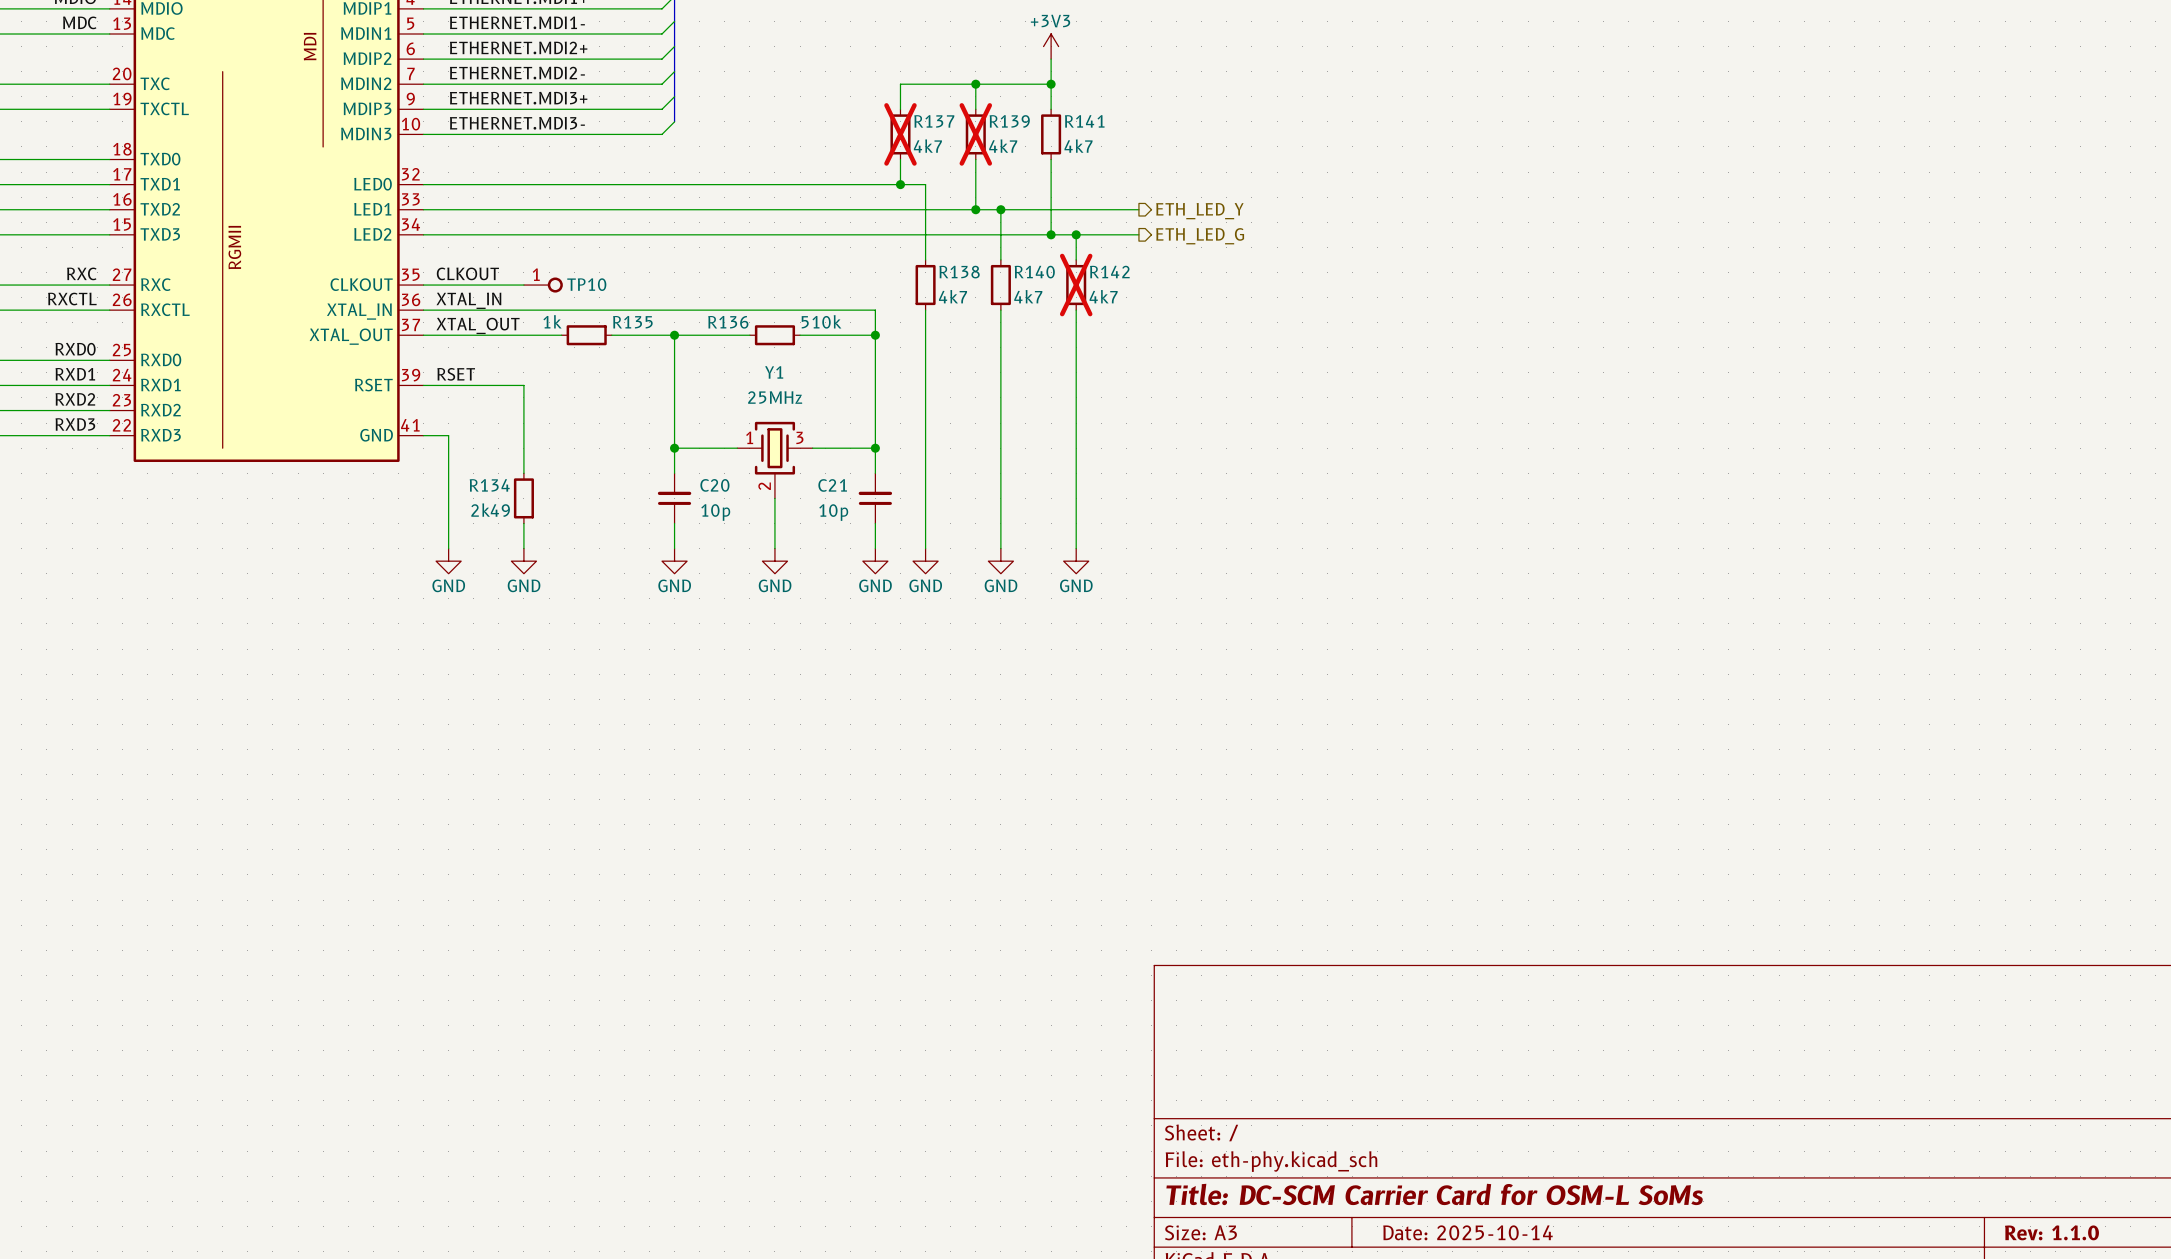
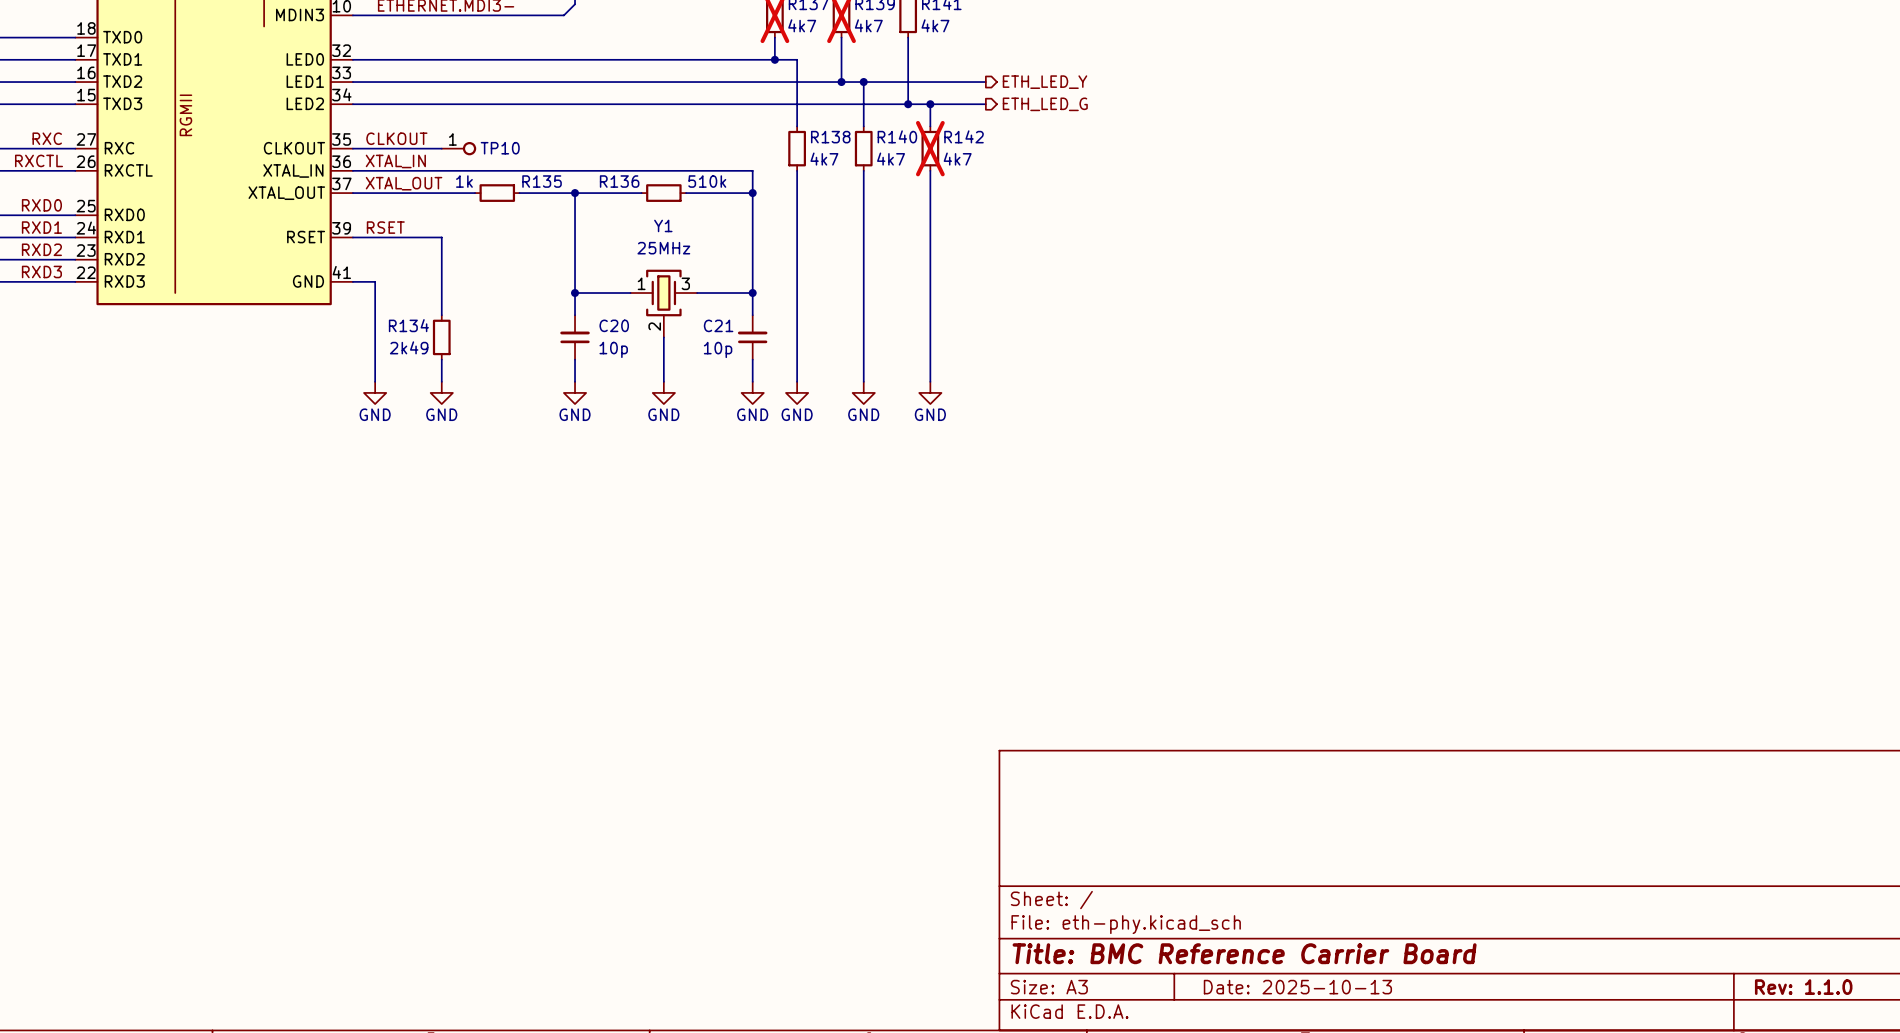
title block: Title: DC-SCM Carrier Card for OSM-L SoMs (1434, 1194) -> Title: BMC Reference Carrier Board (1244, 953)
title block: Date: 2025-10-14 (1468, 1232) -> Date: 2025-10-13 (1297, 987)

